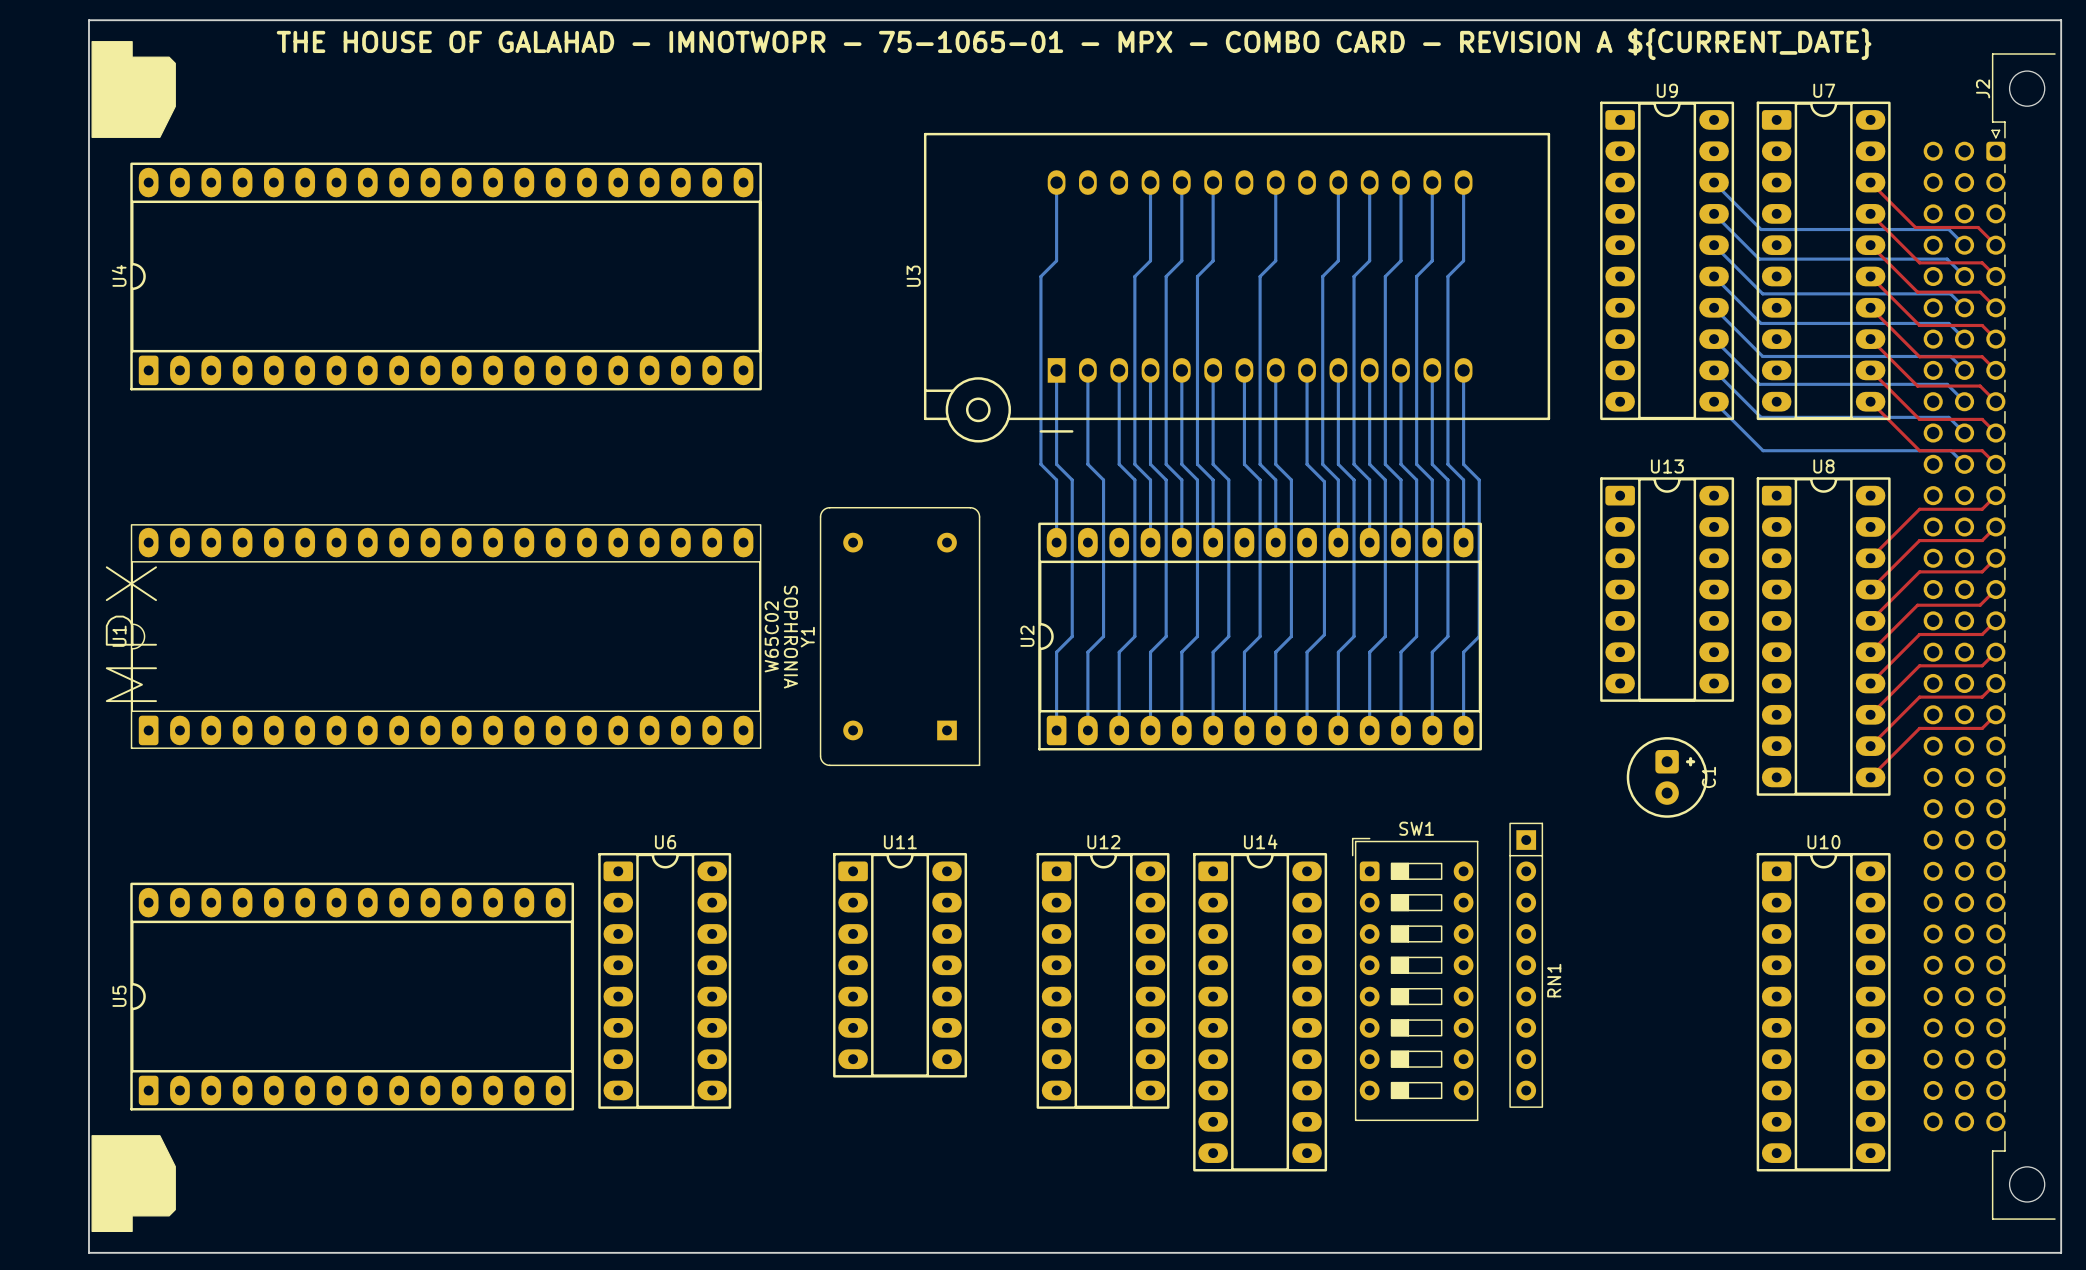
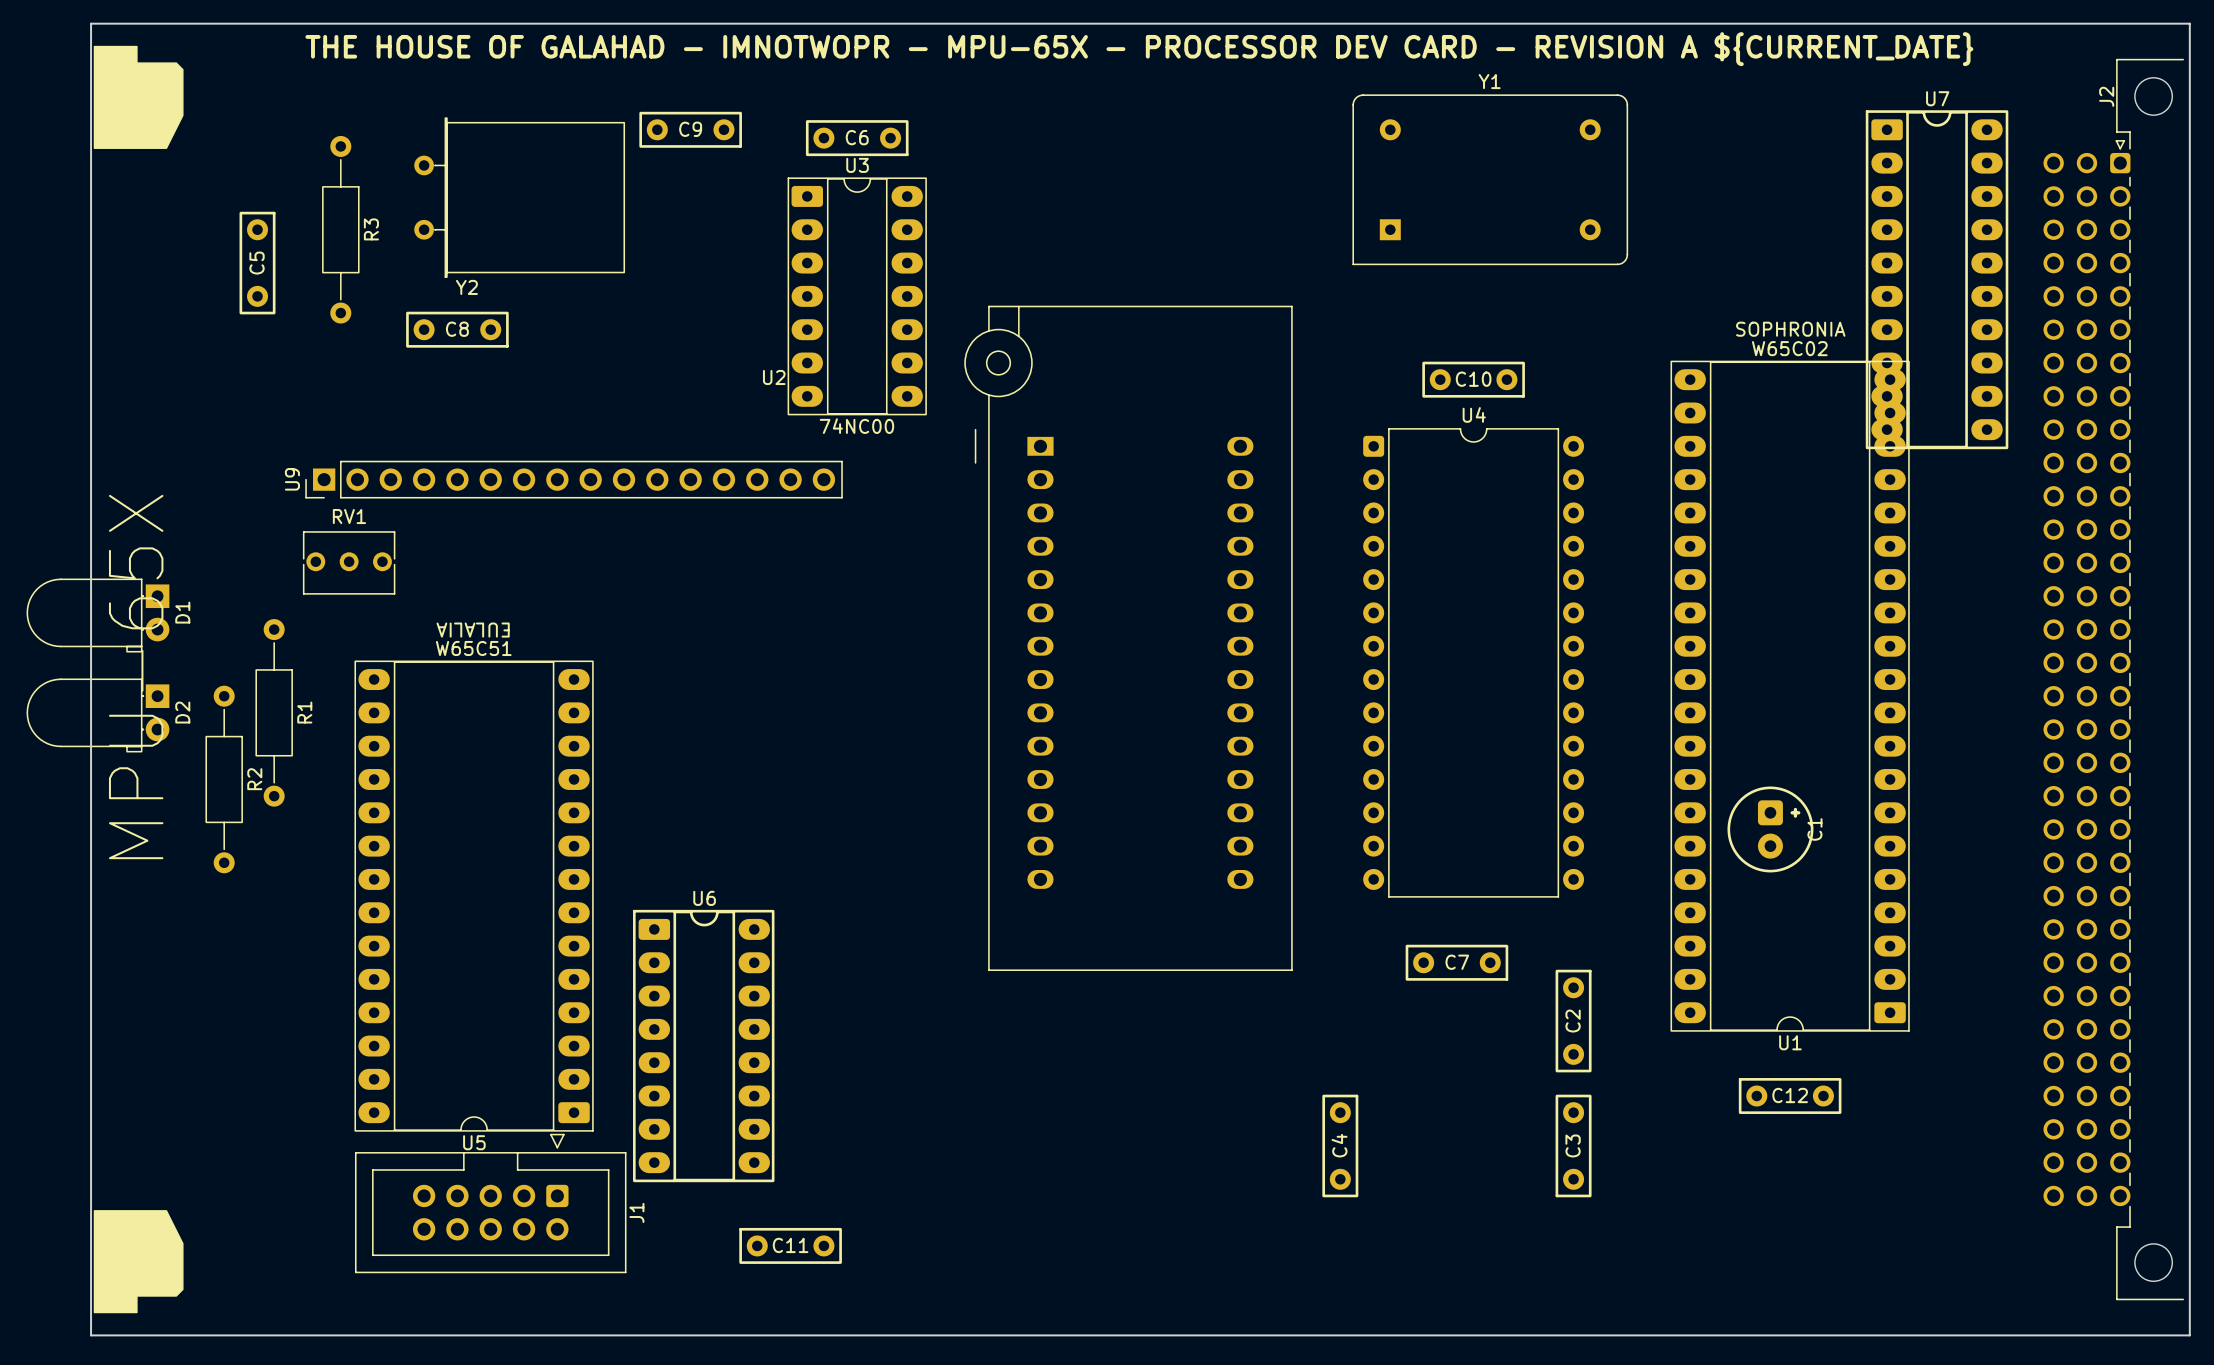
text: THE HOUSE OF GALAHAD - IMNOTWOPR - 75-1065-01 - MPX - COMBO CARD - REVISION A ${CURRENT_DATE} (1074, 44) -> THE HOUSE OF GALAHAD - IMNOTWOPR - MPU-65X - PROCESSOR DEV CARD - REVISION A ${CURRENT_DATE} (1139, 49)
U9 name position: U9 (1667, 90) -> U9 (292, 479)
U9 footprint: [1600, 101, 1735, 421] -> [305, 460, 843, 499]
C9: none -> (690, 129)
C6: none -> (857, 138)
U3 footprint: [923, 132, 1551, 443] -> [787, 177, 927, 416]
U4 footprint: [130, 162, 762, 391] -> [1363, 428, 1585, 898]
bottom track: (1056, 182) (1056, 260) (1040, 276) (1040, 464) (1056, 479) (1056, 542) -> none
bottom track: (1150, 182) (1150, 260) (1134, 276) (1134, 464) (1150, 479) (1150, 542) -> none
bottom track: (1181, 182) (1181, 260) (1166, 276) (1166, 464) (1181, 479) (1181, 542) -> none
bottom track: (1213, 182) (1213, 260) (1197, 276) (1197, 464) (1213, 479) (1213, 542) -> none
bottom track: (1275, 182) (1275, 260) (1260, 276) (1260, 464) (1275, 479) (1275, 542) -> none
bottom track: (1338, 182) (1338, 260) (1322, 276) (1322, 464) (1338, 479) (1338, 542) -> none
bottom track: (1369, 182) (1369, 260) (1354, 276) (1354, 464) (1369, 479) (1369, 542) -> none
bottom track: (1400, 182) (1400, 260) (1385, 276) (1385, 464) (1400, 479) (1400, 542) -> none
bottom track: (1432, 182) (1432, 260) (1416, 276) (1416, 464) (1432, 479) (1432, 542) -> none
bottom track: (1463, 182) (1463, 260) (1447, 276) (1447, 464) (1463, 479) (1463, 542) -> none
bottom track: (1714, 182) (1761, 229) (1948, 229) (1964, 245) -> none
top track: (1870, 182) (1915, 227) (1978, 227) (1995, 245) -> none
Y2: none -> (519, 197)
R3: none -> (340, 229)
bottom track: (1714, 213) (1759, 259) (1947, 259) (1964, 276) -> none
top track: (1870, 213) (1919, 262) (1982, 262) (1995, 276) -> none
C5: none -> (257, 263)
bottom track: (1714, 245) (1762, 293) (1950, 293) (1964, 307) -> none
top track: (1870, 245) (1917, 292) (1980, 292) (1995, 307) -> none
U4 name position: U4 (119, 275) -> U4 (1474, 414)
U3 name position: U3 (913, 276) -> U3 (857, 165)
bottom track: (1714, 276) (1761, 323) (1948, 323) (1964, 339) -> none
top track: (1870, 276) (1919, 325) (1982, 325) (1995, 339) -> none
C8: none -> (457, 329)
bottom track: (1714, 307) (1762, 356) (1950, 356) (1964, 370) -> none
top track: (1870, 307) (1919, 356) (1982, 356) (1995, 370) -> none
bottom track: (1714, 339) (1759, 384) (1947, 384) (1964, 401) -> none
top track: (1870, 339) (1917, 386) (1980, 386) (1995, 401) -> none
C10: none -> (1473, 379)
bottom track: (1056, 370) (1056, 464) (1072, 479) (1072, 636) (1056, 652) (1056, 730) -> none
bottom track: (1087, 370) (1087, 464) (1103, 479) (1103, 636) (1087, 652) (1087, 730) -> none
bottom track: (1119, 370) (1119, 464) (1134, 479) (1134, 636) (1119, 652) (1119, 730) -> none
bottom track: (1150, 370) (1150, 464) (1166, 479) (1166, 636) (1150, 652) (1150, 730) -> none
bottom track: (1181, 370) (1181, 464) (1197, 479) (1197, 636) (1181, 652) (1181, 730) -> none
bottom track: (1213, 370) (1213, 464) (1228, 479) (1228, 636) (1213, 652) (1213, 730) -> none
bottom track: (1244, 370) (1244, 464) (1260, 479) (1260, 636) (1244, 652) (1244, 730) -> none
bottom track: (1275, 370) (1275, 464) (1291, 479) (1291, 636) (1275, 652) (1275, 730) -> none
bottom track: (1307, 370) (1307, 464) (1324, 481) (1324, 634) (1307, 652) (1307, 730) -> none
bottom track: (1338, 370) (1338, 464) (1354, 479) (1354, 636) (1338, 652) (1338, 730) -> none
bottom track: (1369, 370) (1369, 464) (1385, 479) (1385, 636) (1369, 652) (1369, 730) -> none
bottom track: (1400, 370) (1400, 464) (1416, 479) (1416, 636) (1400, 652) (1400, 730) -> none
bottom track: (1432, 370) (1432, 464) (1447, 479) (1447, 636) (1432, 652) (1432, 730) -> none
bottom track: (1463, 370) (1463, 464) (1479, 479) (1479, 636) (1463, 652) (1463, 730) -> none
bottom track: (1714, 370) (1761, 417) (1948, 417) (1964, 433) -> none
top track: (1870, 370) (1919, 419) (1982, 419) (1995, 433) -> none
U3 value: none -> 74NC00 (856, 426)
bottom track: (1714, 401) (1763, 450) (1950, 450) (1964, 464) -> none
top track: (1870, 401) (1919, 450) (1982, 450) (1995, 464) -> none
top track: (1995, 495) (1982, 509) (1919, 509) (1870, 558) -> none
U2 footprint: [1038, 522, 1482, 751] -> [964, 305, 1293, 972]
RV1: none -> (349, 562)
top track: (1995, 526) (1982, 540) (1919, 540) (1870, 589) -> none
top track: (1995, 558) (1982, 571) (1919, 571) (1870, 620) -> none
D1: none -> (97, 615)
U13: (1667, 589) -> none
top track: (1995, 589) (1980, 605) (1917, 605) (1870, 652) -> none
U5 text: none -> EULALIA (473, 630)
U5 value: none -> W65C51 (473, 648)
top track: (1995, 620) (1982, 634) (1919, 634) (1870, 683) -> none
text: MPX (131, 634) -> MPU-65X (136, 677)
U1 rotation: 0° (446, 636) -> 90° counterclockwise (1790, 696)
U1 position: (446, 636) -> (1790, 696)
Y1 rotation: 0° (900, 636) -> 90° clockwise (1490, 179)
Y1 position: (900, 636) -> (1490, 179)
U2 name position: U2 (1027, 636) -> U2 (774, 377)
U8: (1823, 636) -> none
top track: (1995, 652) (1982, 665) (1919, 665) (1870, 714) -> none
R1: none -> (274, 712)
D2: none -> (97, 715)
top track: (1995, 683) (1982, 697) (1919, 697) (1870, 746) -> none
top track: (1995, 714) (1982, 728) (1919, 728) (1870, 777) -> none
R2: none -> (224, 779)
U5 footprint: [130, 882, 575, 1111] -> [354, 660, 594, 1132]
C7: none -> (1456, 962)
C2: none -> (1573, 1021)
U11: (900, 965) -> none
RN1: (1526, 965) -> none
SW1: (1415, 979) -> none
U12: (1103, 980) -> none
U5 name position: U5 (119, 996) -> U5 (474, 1142)
U14: (1260, 1012) -> none
U10: (1823, 1012) -> none
C12: none -> (1790, 1096)
C4: none -> (1340, 1145)
C3: none -> (1573, 1145)
J1: none -> (490, 1203)
C11: none -> (790, 1245)

